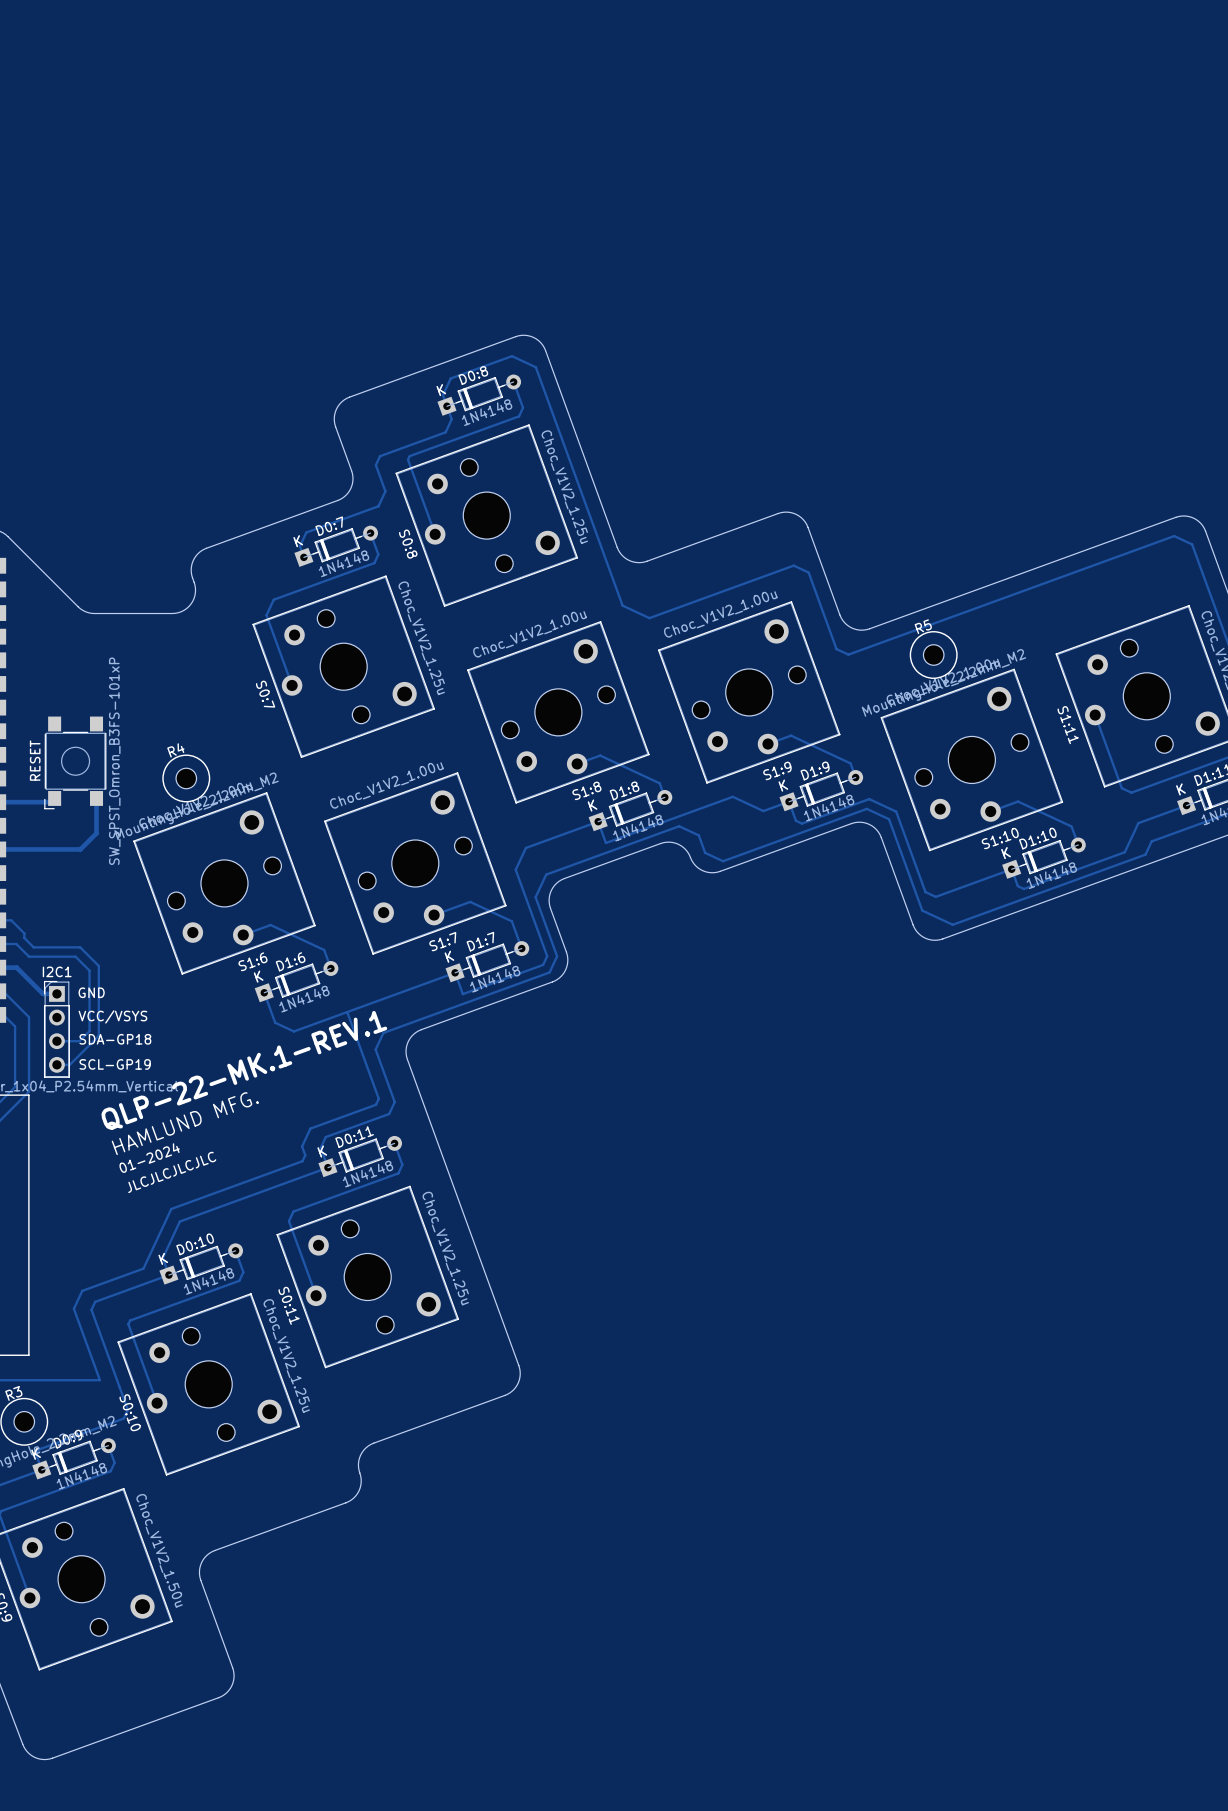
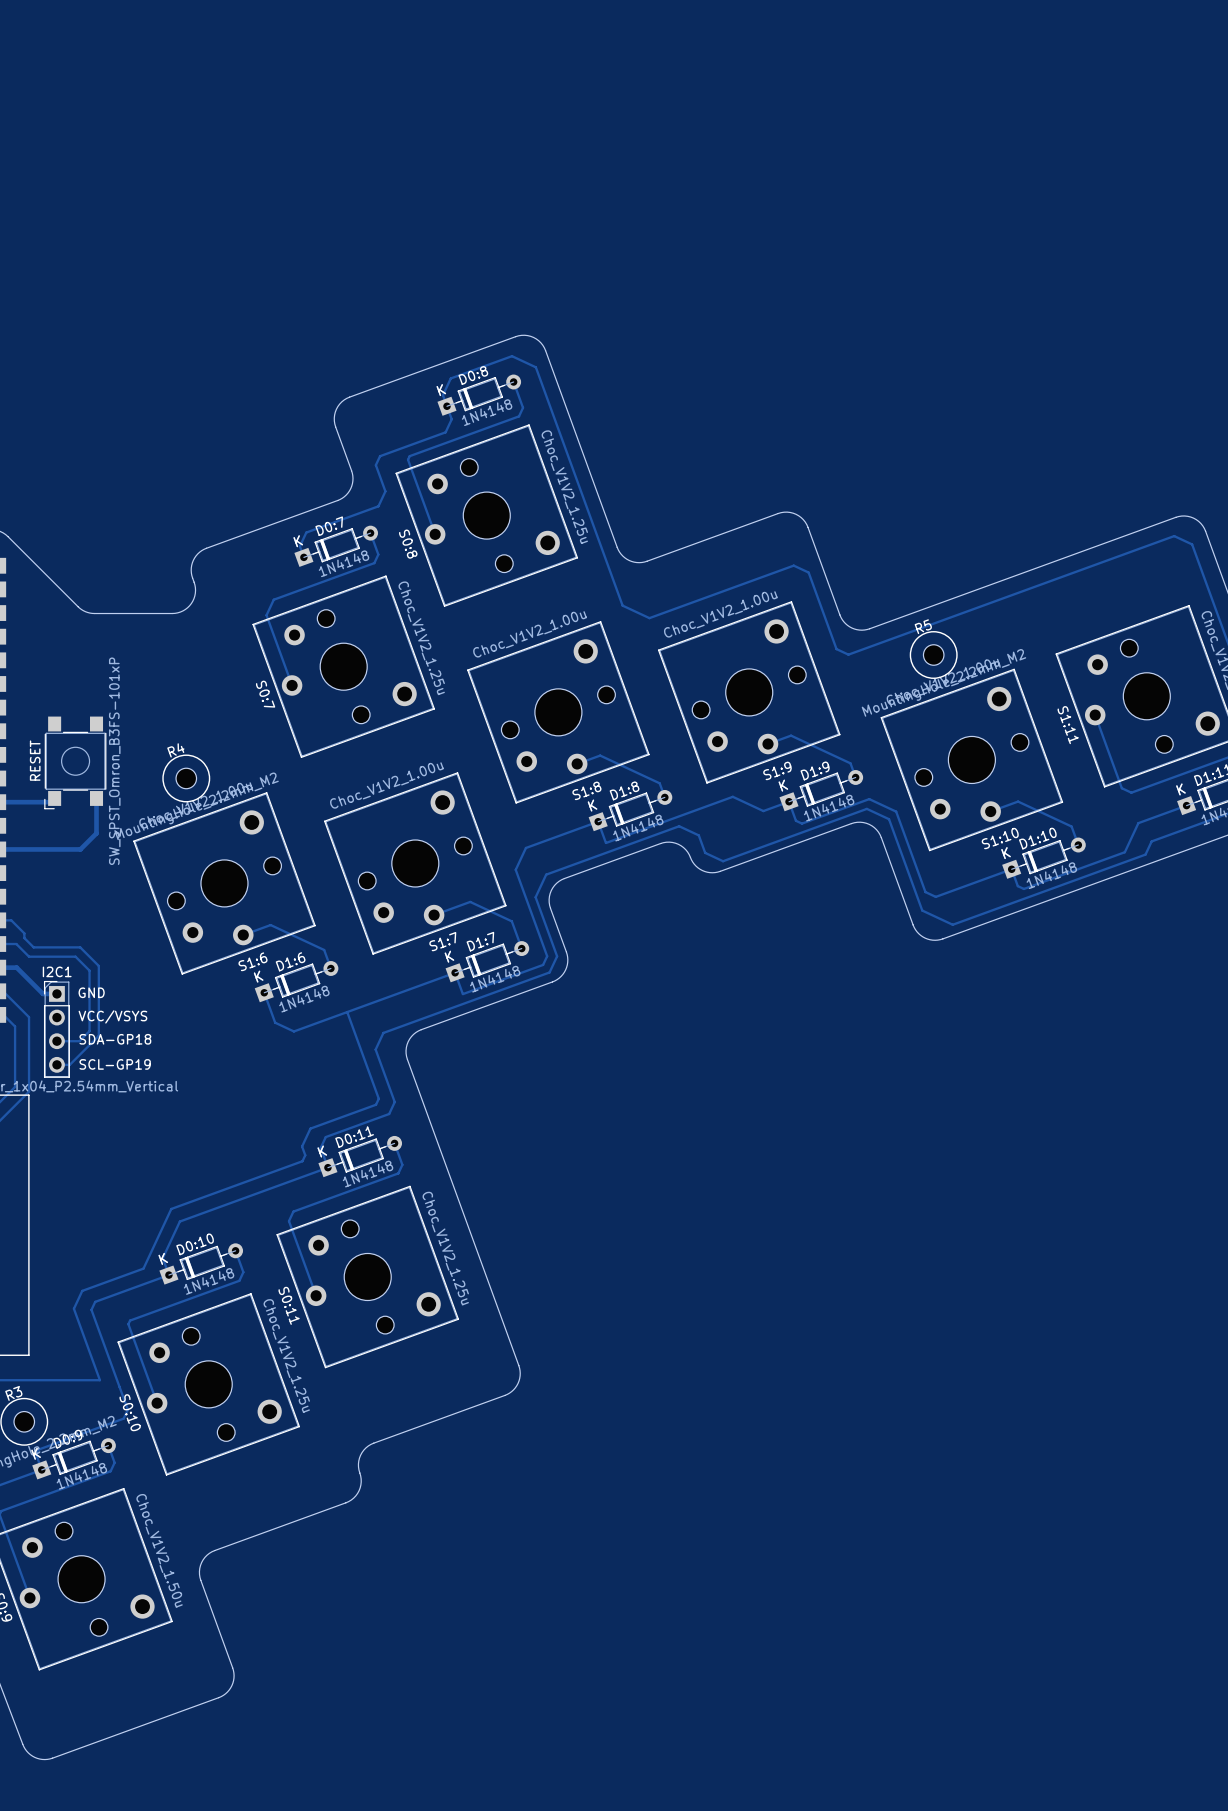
text: QLP-22-MK.1-REV.1 (244, 1070) -> none
text: HAMLUND MFG. (185, 1123) -> none
text: 01-2024 (149, 1158) -> none
text: JLCJLCJLCJLC (172, 1172) -> none

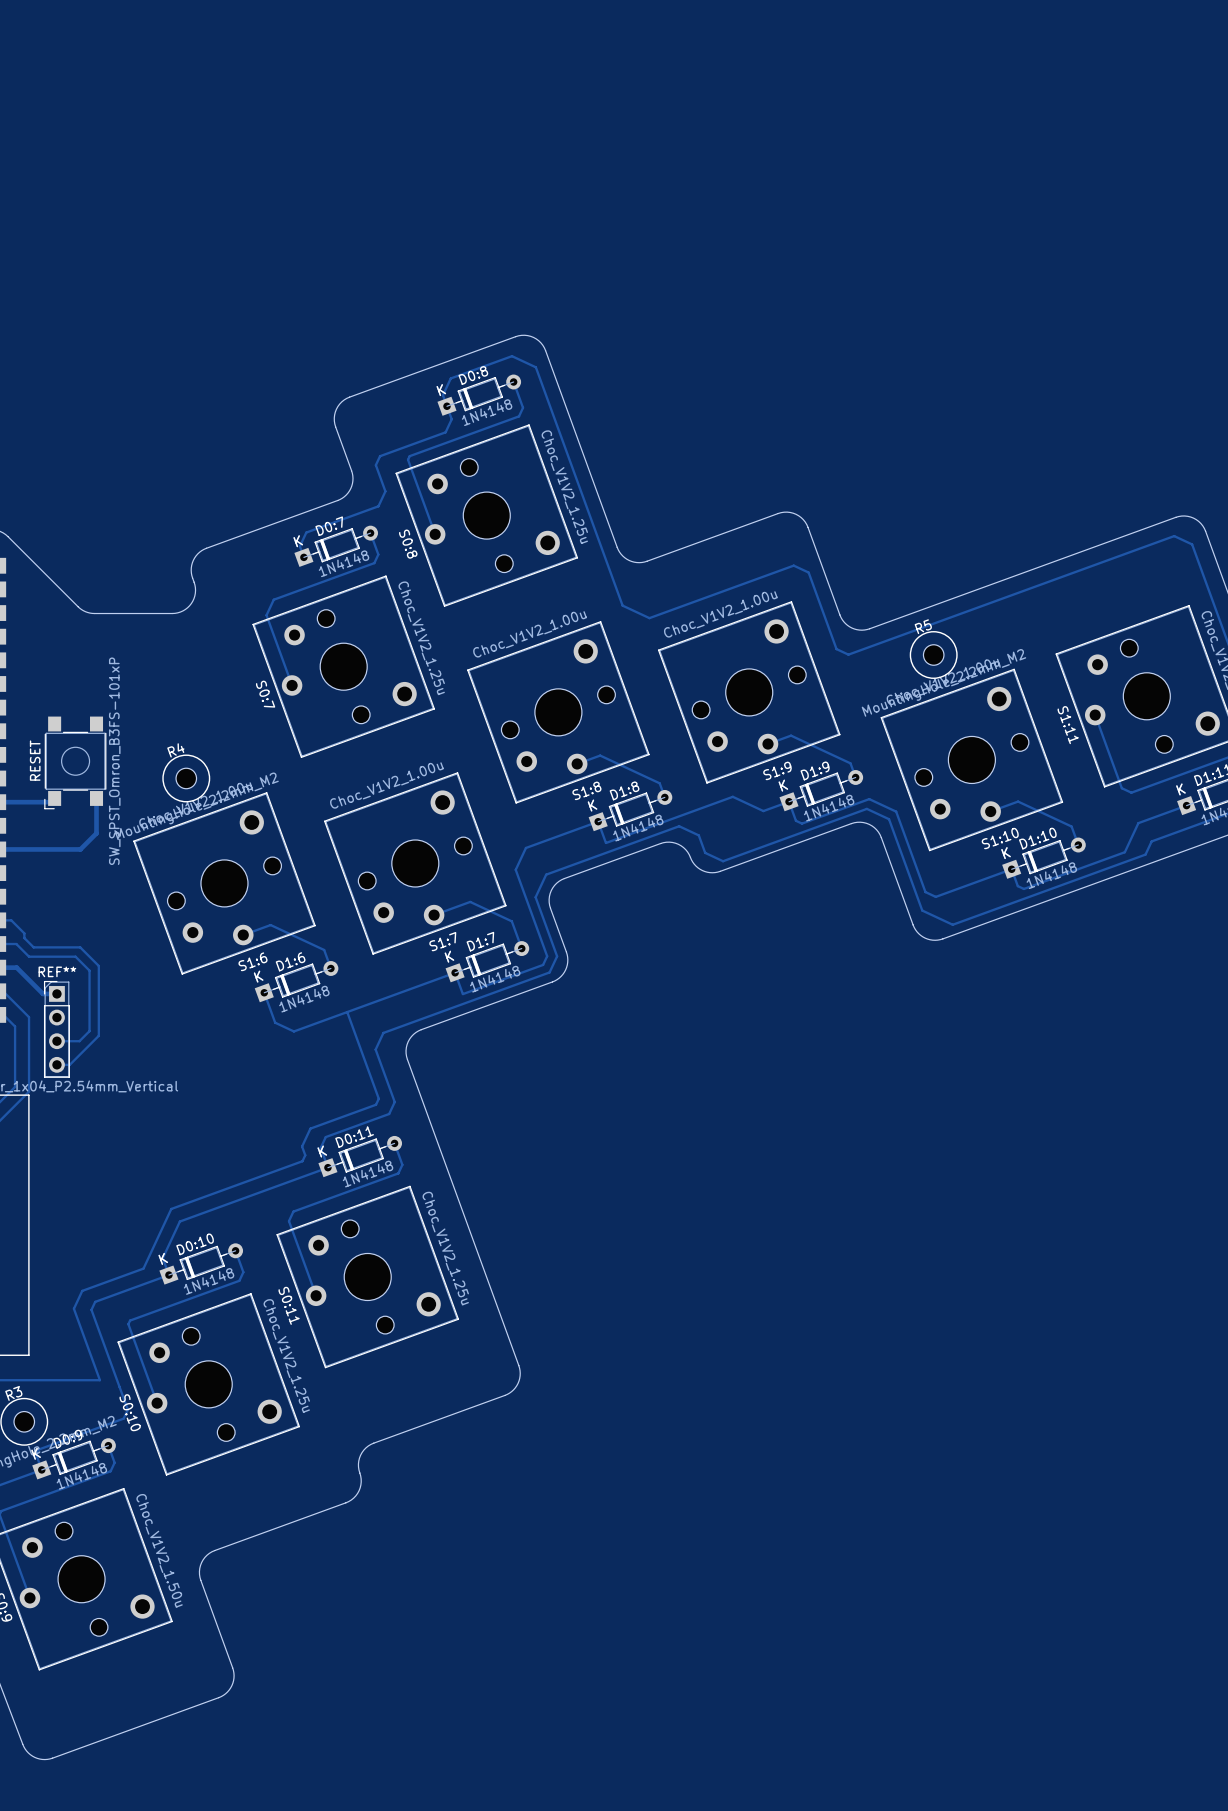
I2C1 name: I2C1 (57, 971) -> REF** (57, 971)
text: GND (91, 992) -> none
text: VCC/VSYS (112, 1016) -> none
text: SDA-GP18 (115, 1039) -> none
text: SCL-GP19 (115, 1064) -> none

